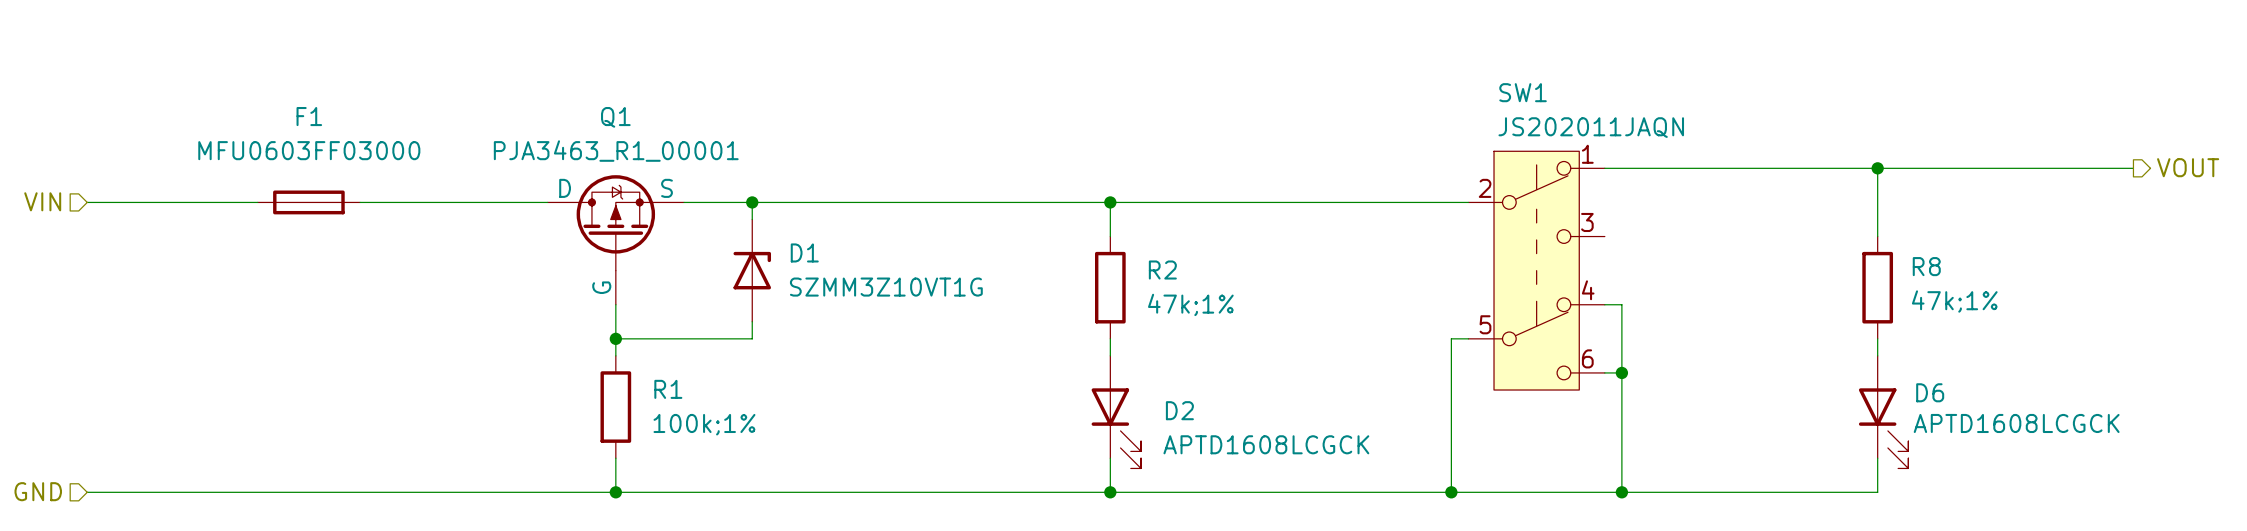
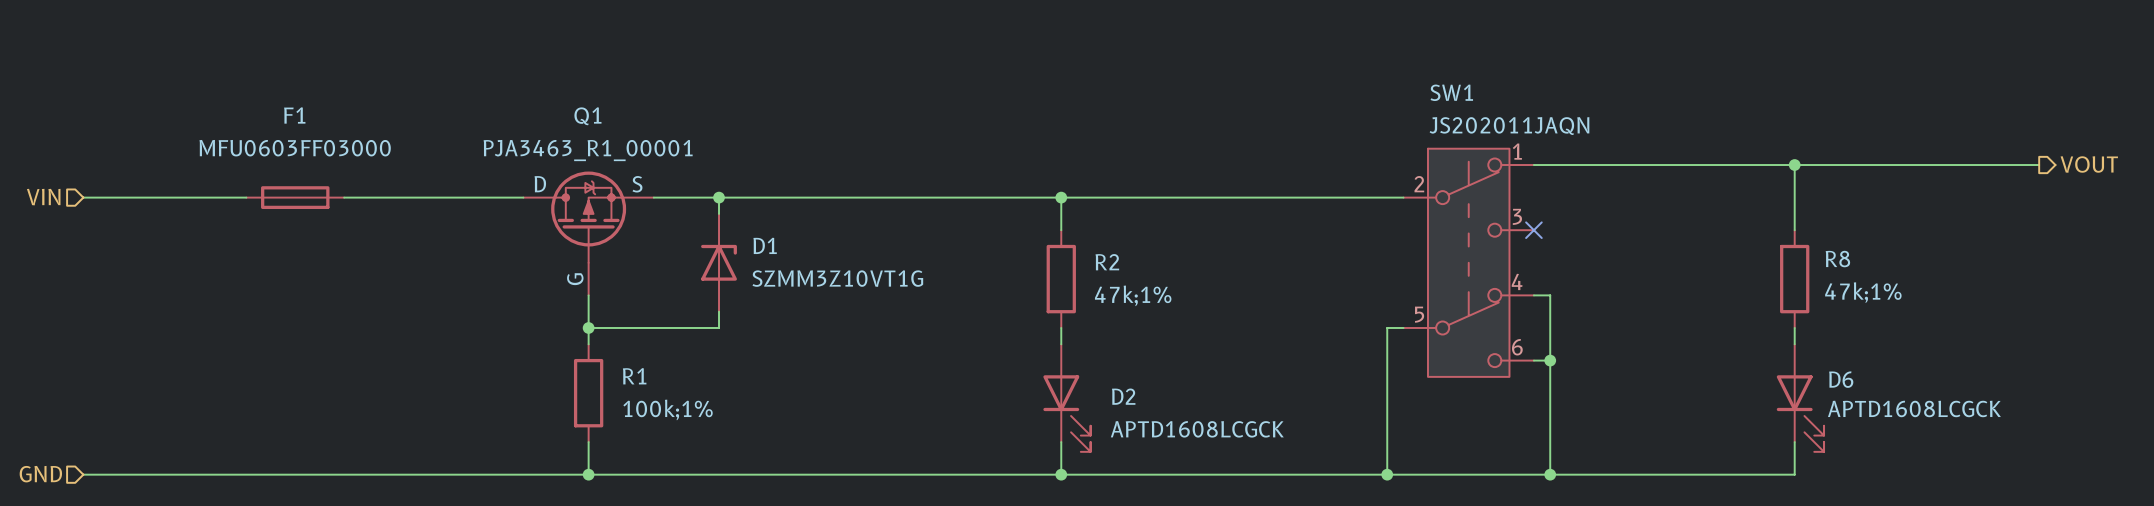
no-connect mark: none -> (1533, 230)

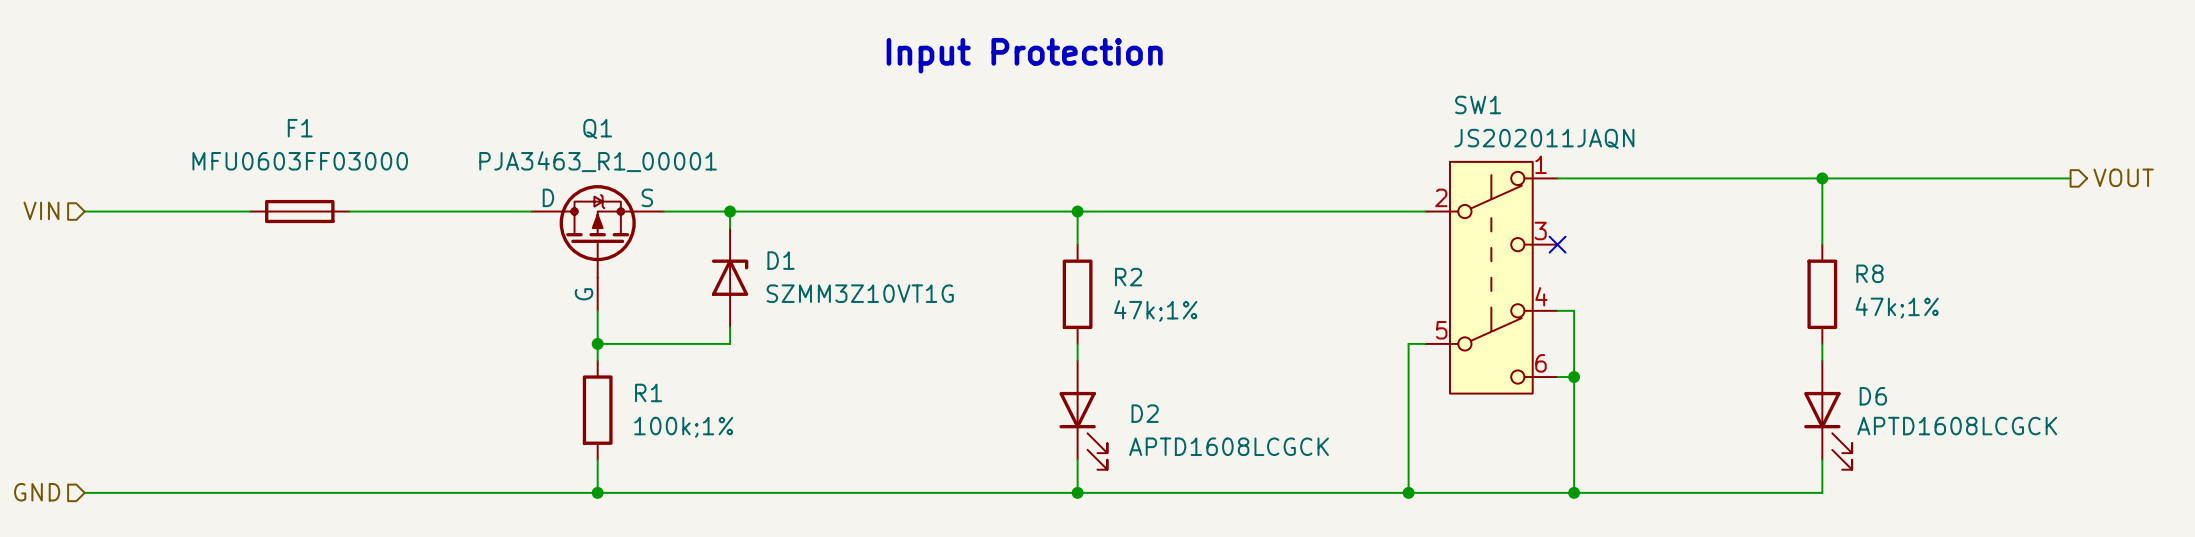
text: none -> Input Protection (1024, 55)

